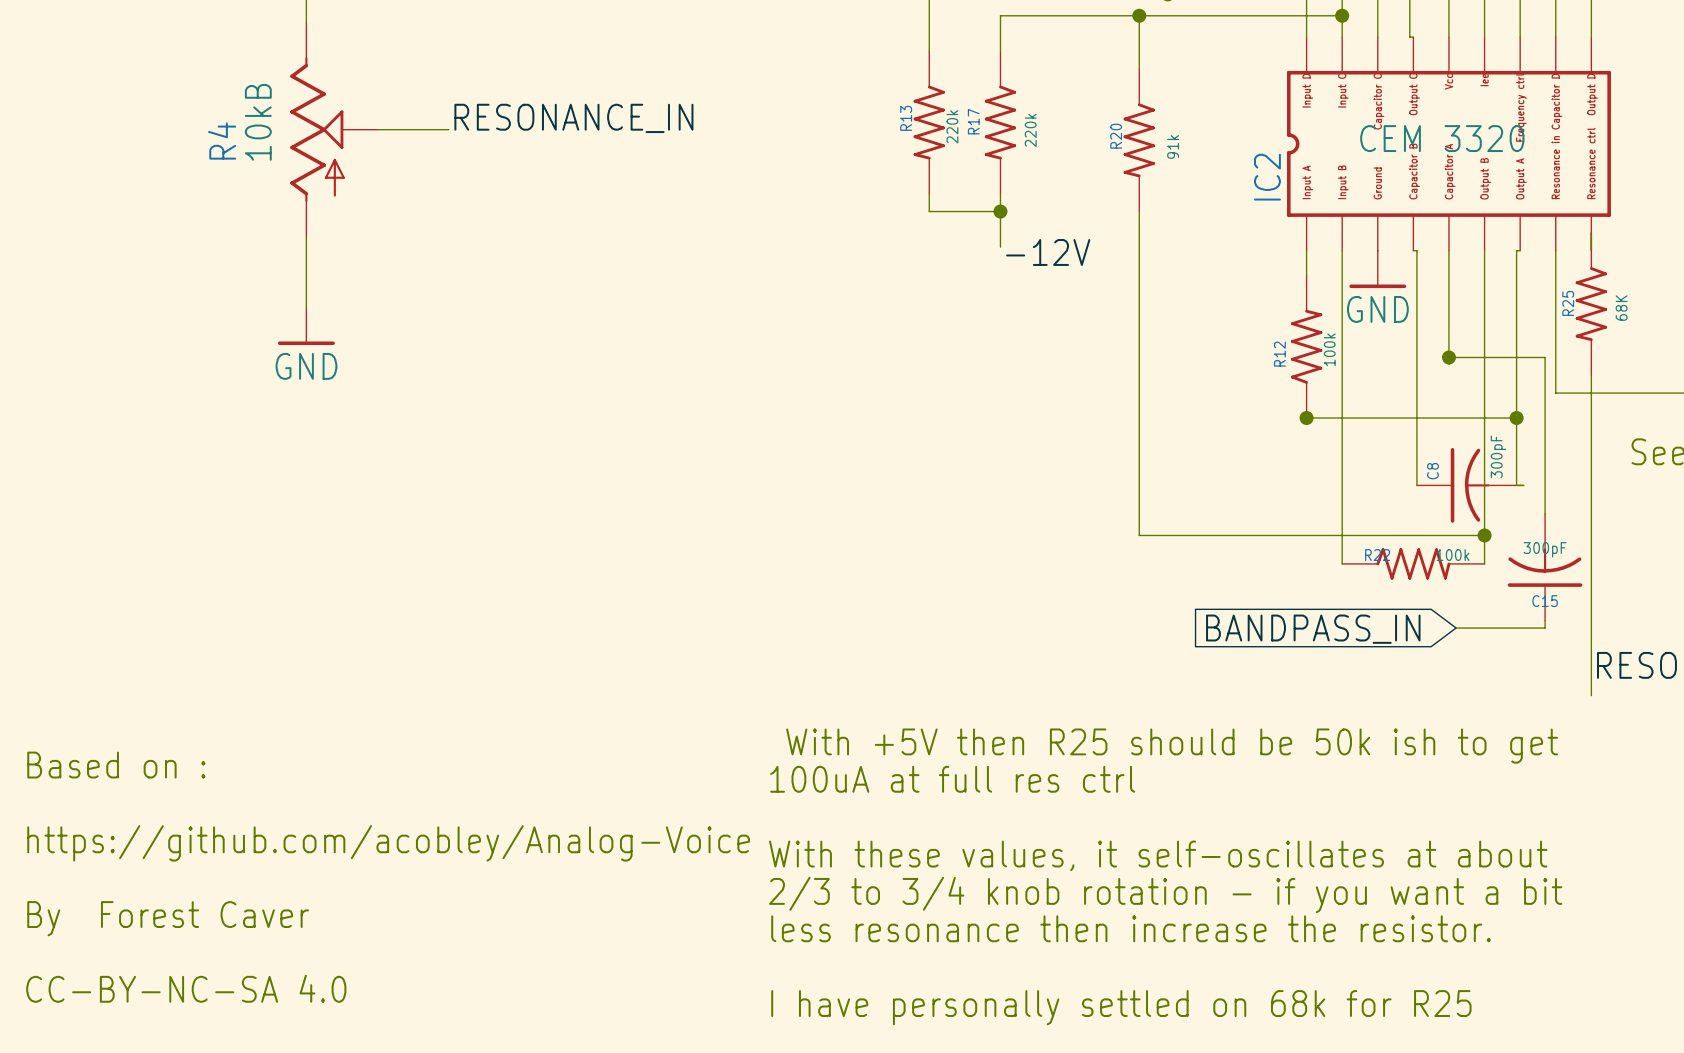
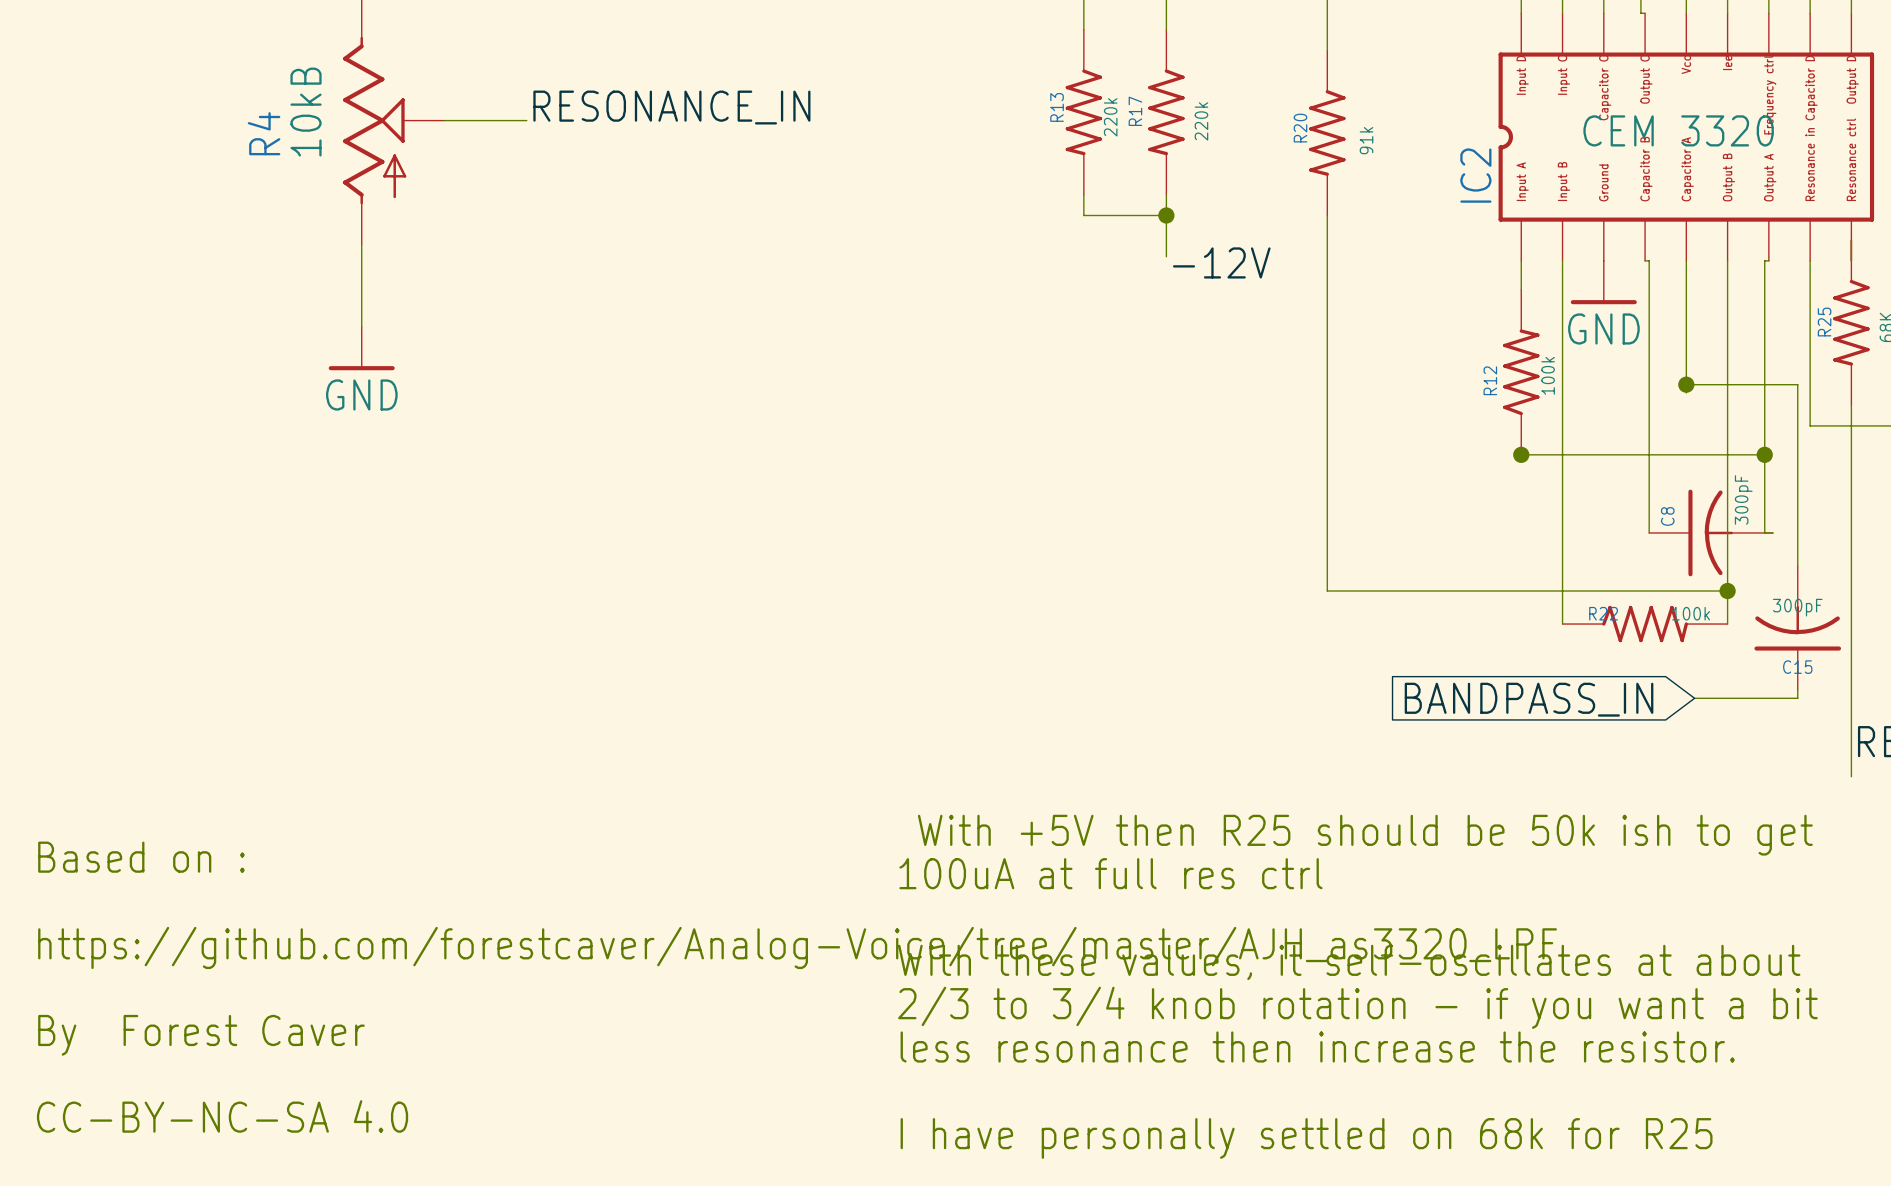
text: https://github.com/acobley/Analog-Voice (388, 843) -> https://github.com/forestcaver/Analog-Voice/tree/master/AJH_as3320_LPF (797, 947)

